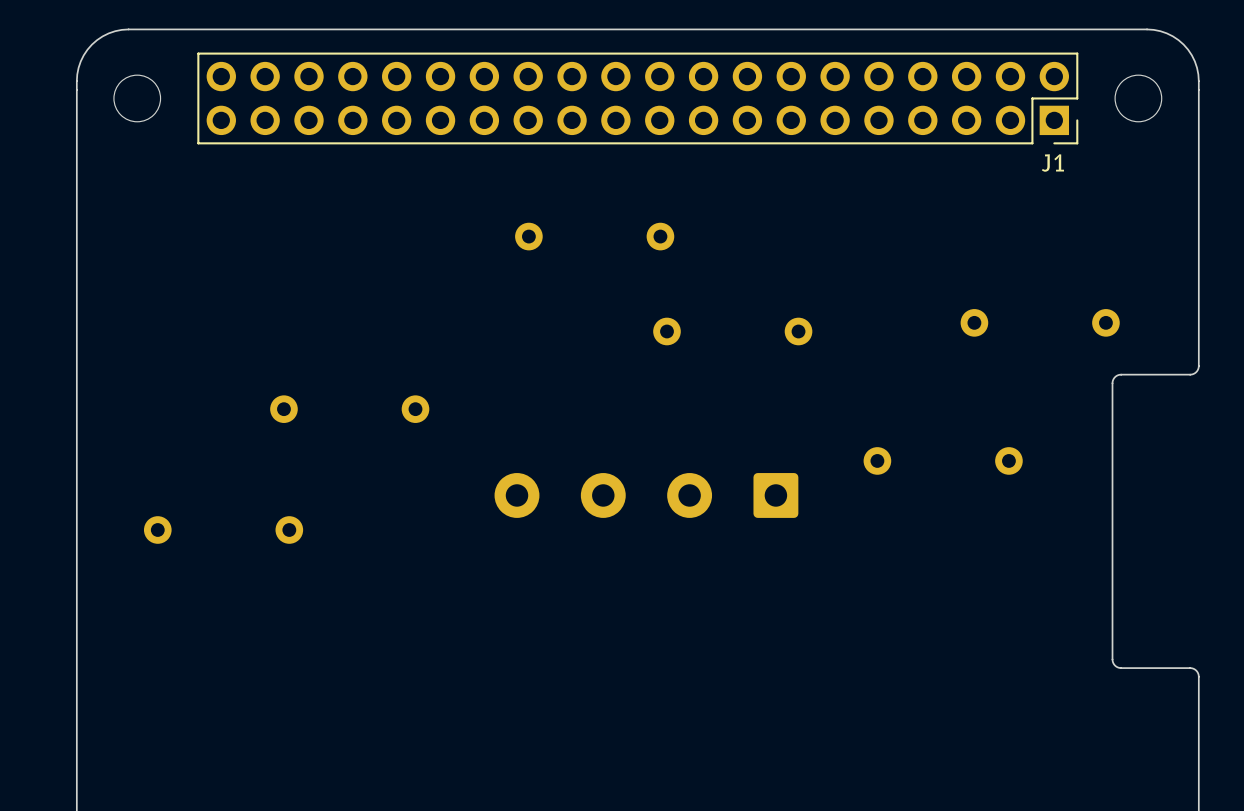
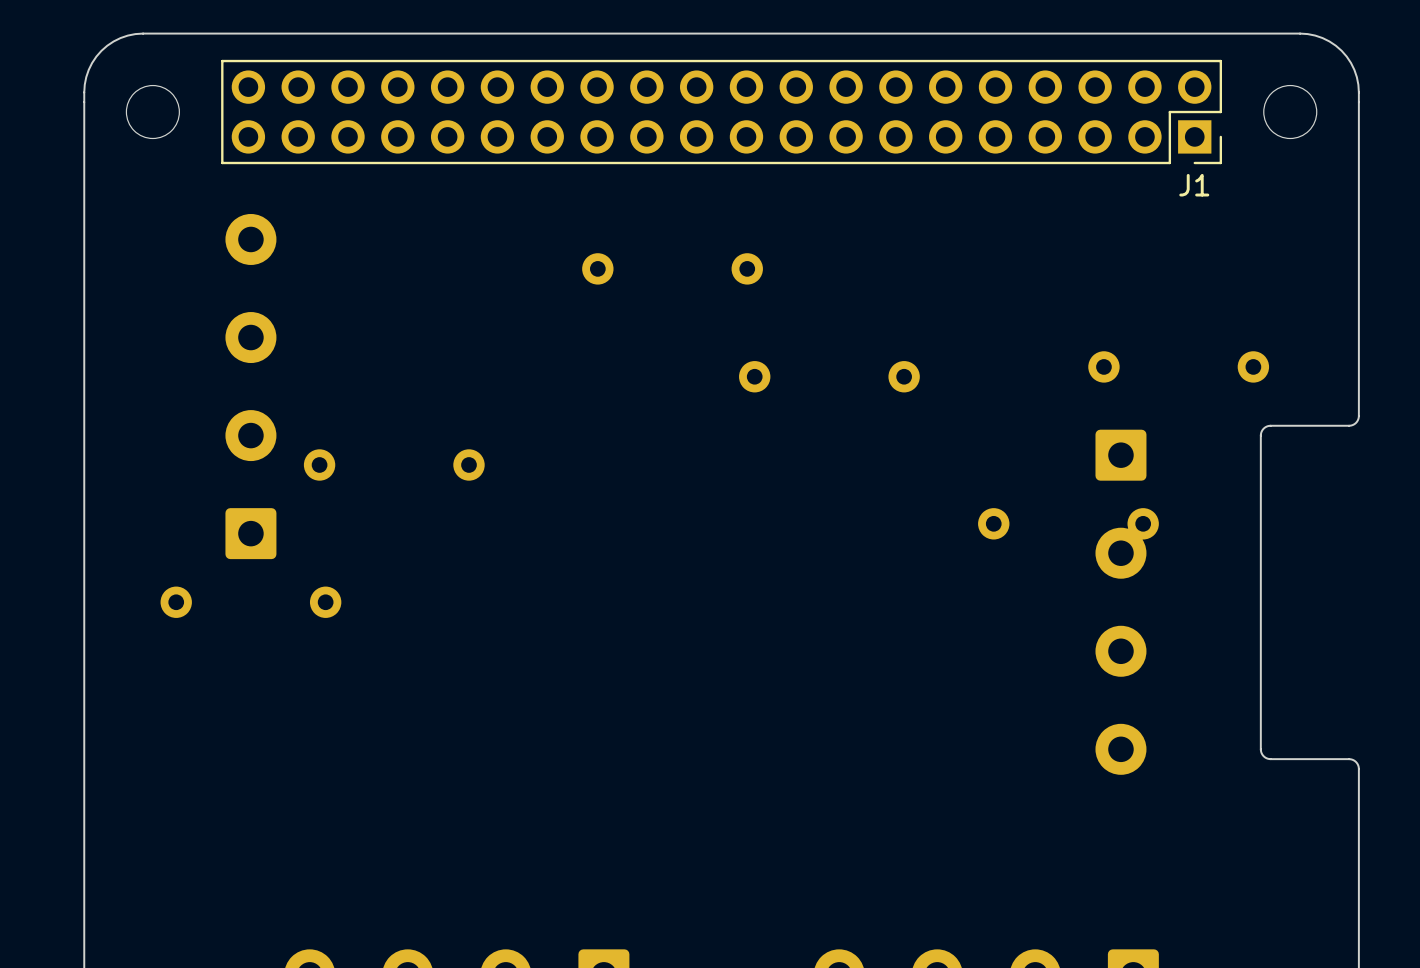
part: none -> (250, 386)
part: (646, 495) -> none
part: none -> (1120, 602)

